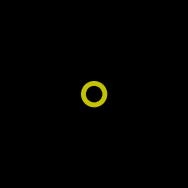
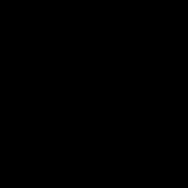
part: (94, 94) -> none

